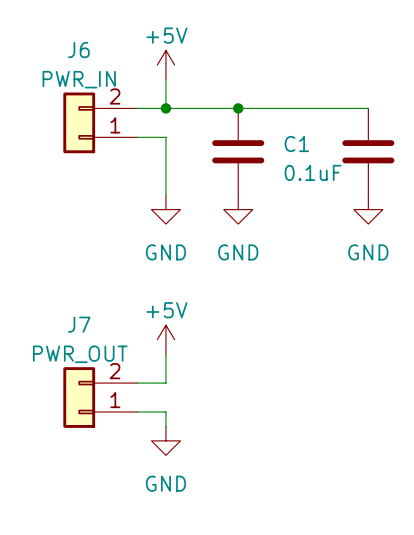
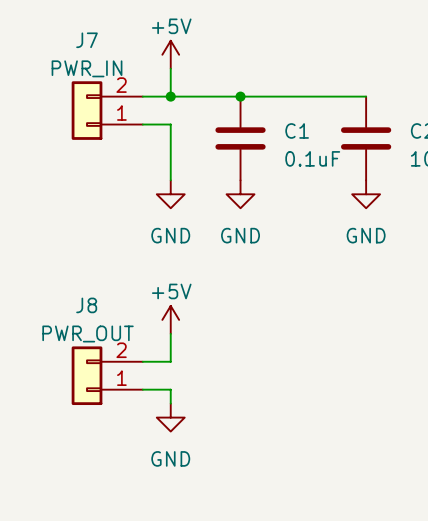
J6 name: J6 (78, 50) -> J7 (87, 40)
J7 name: J7 (79, 324) -> J8 (86, 305)

